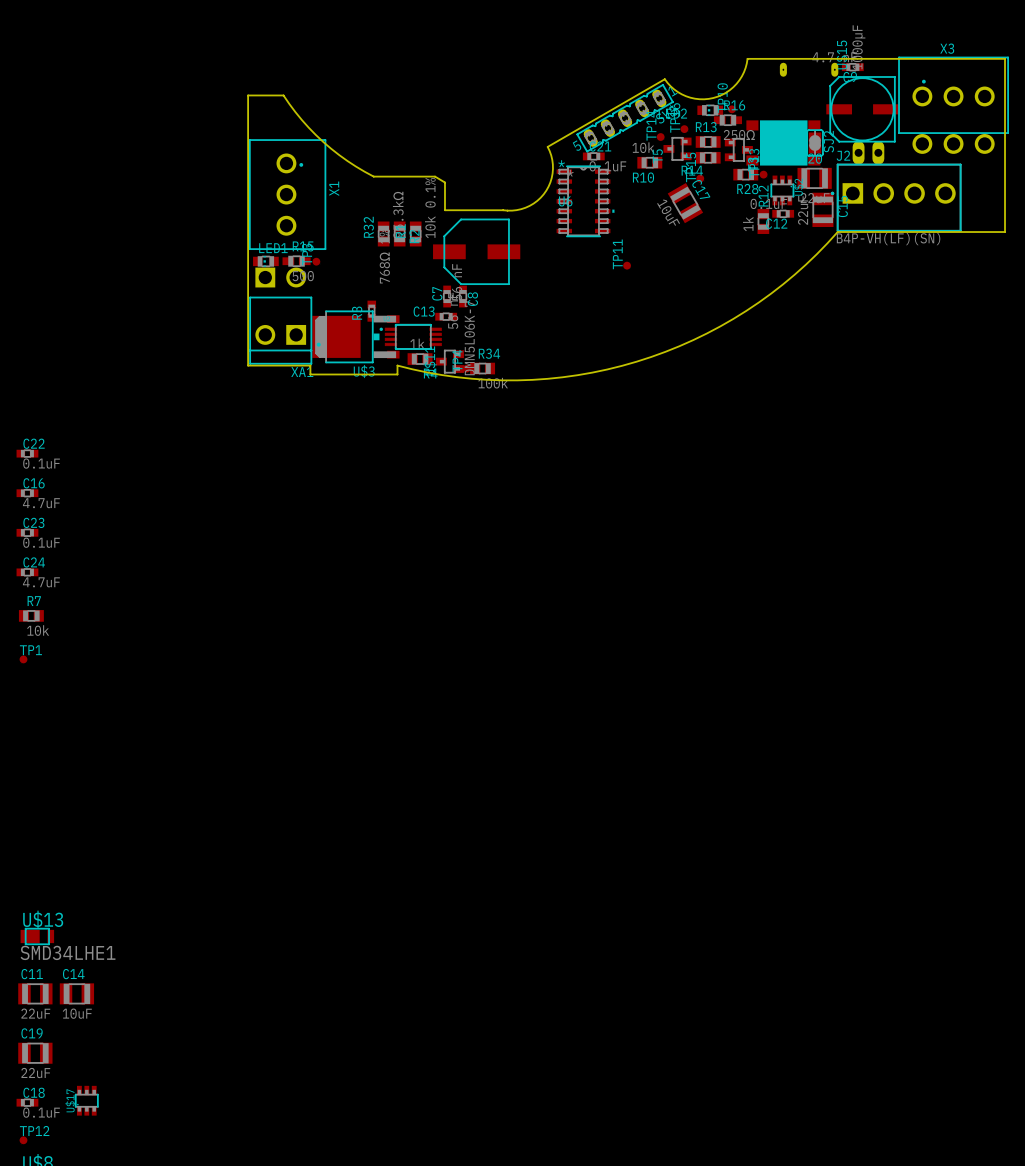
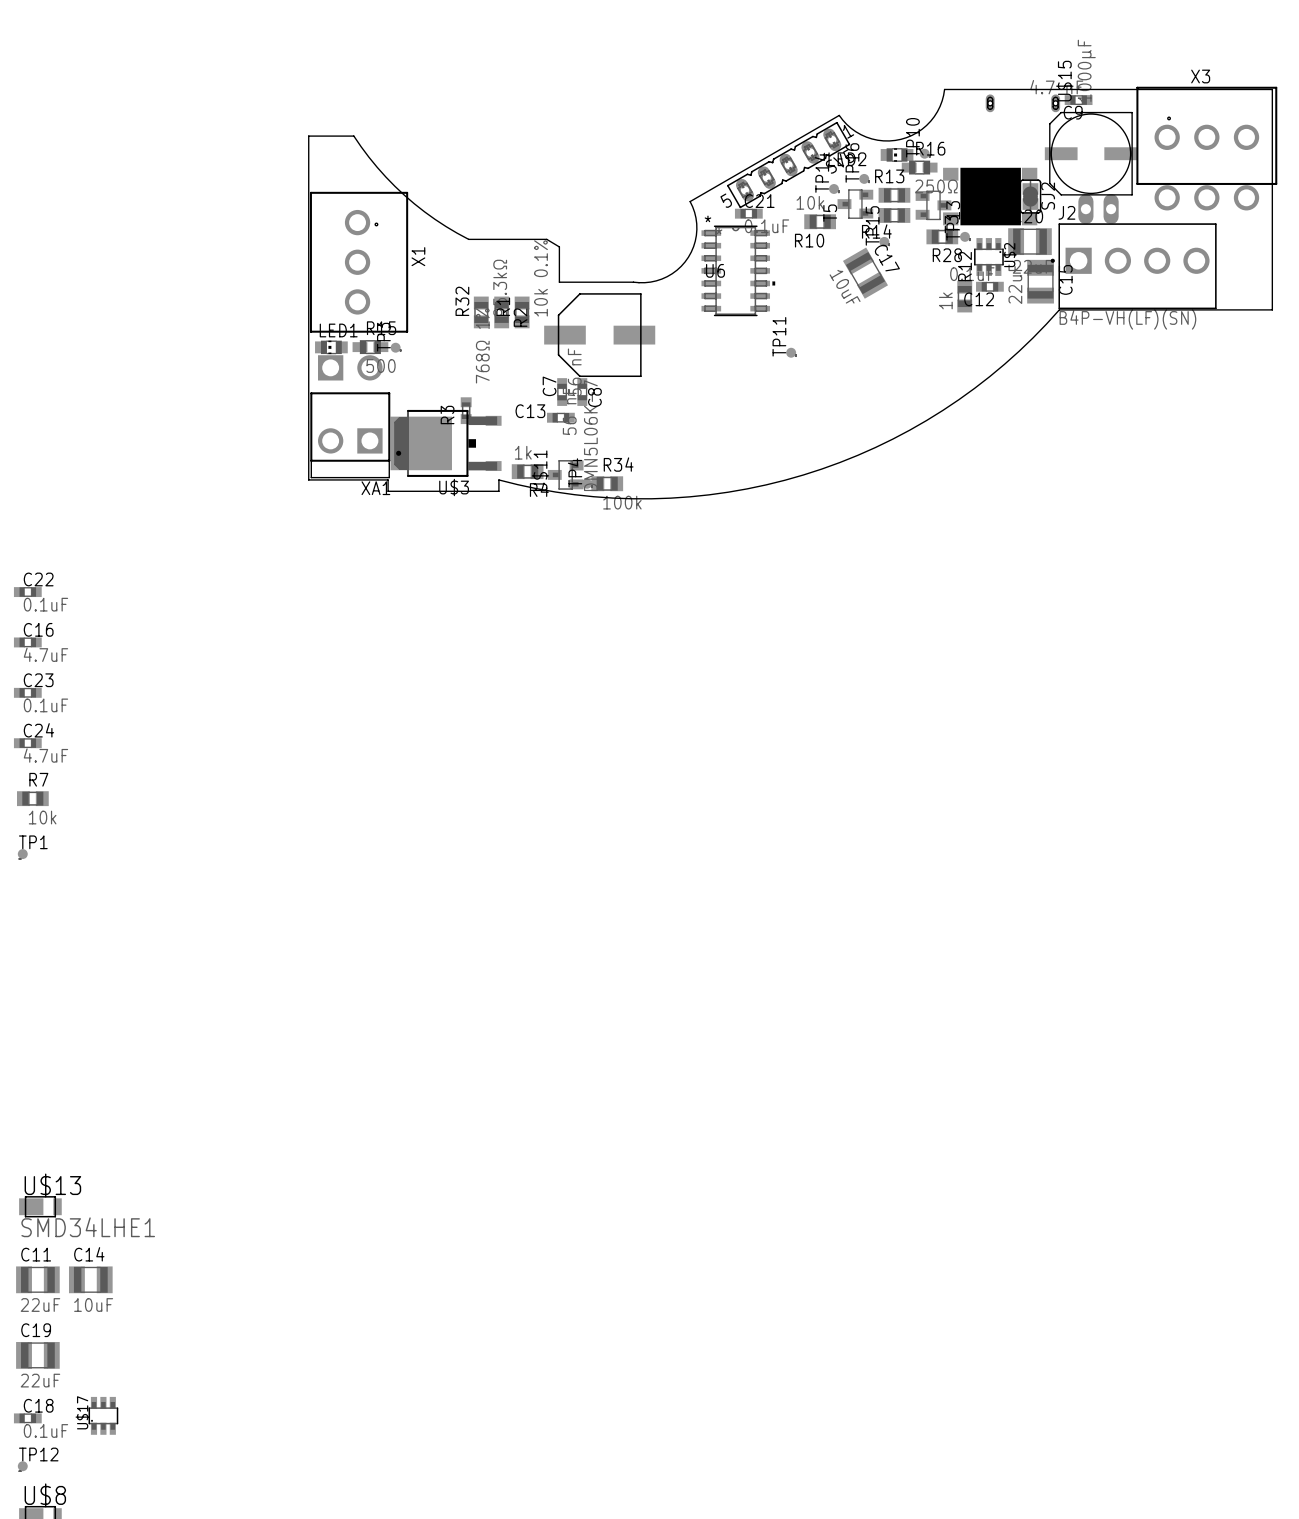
part: (410, 336) -> none

